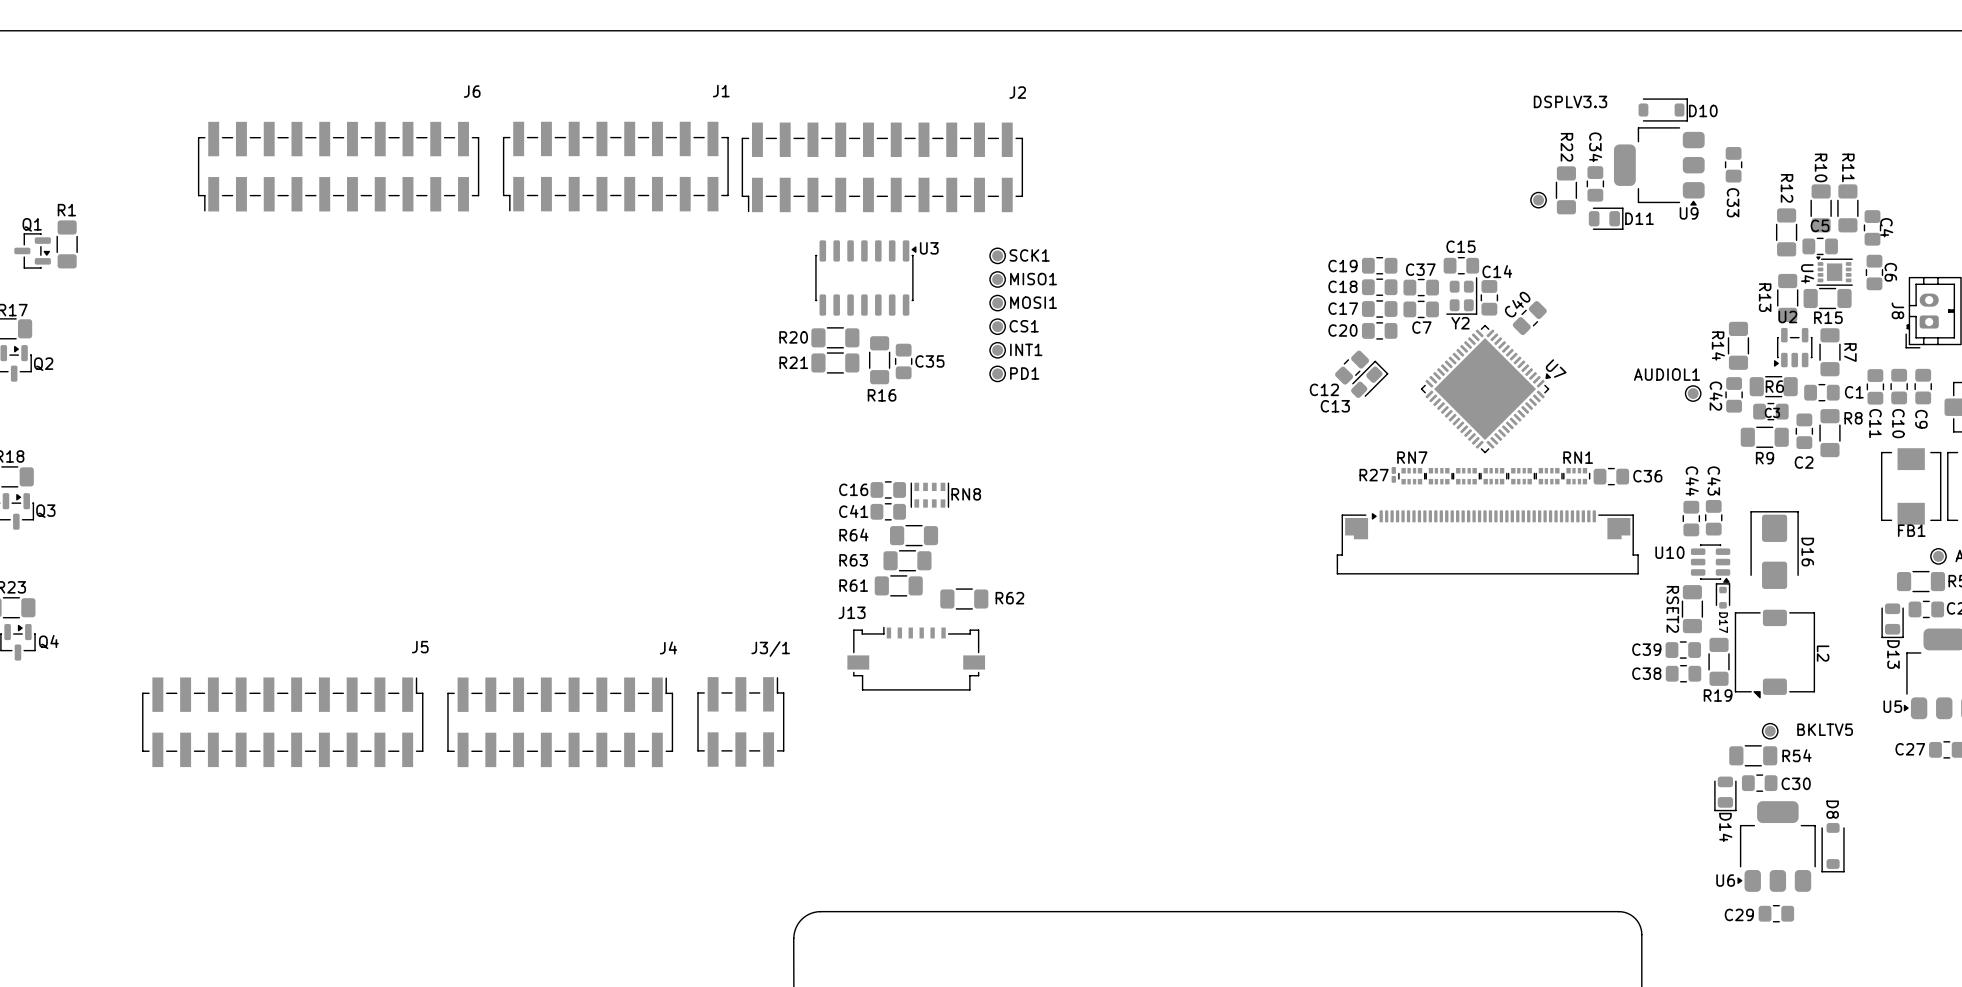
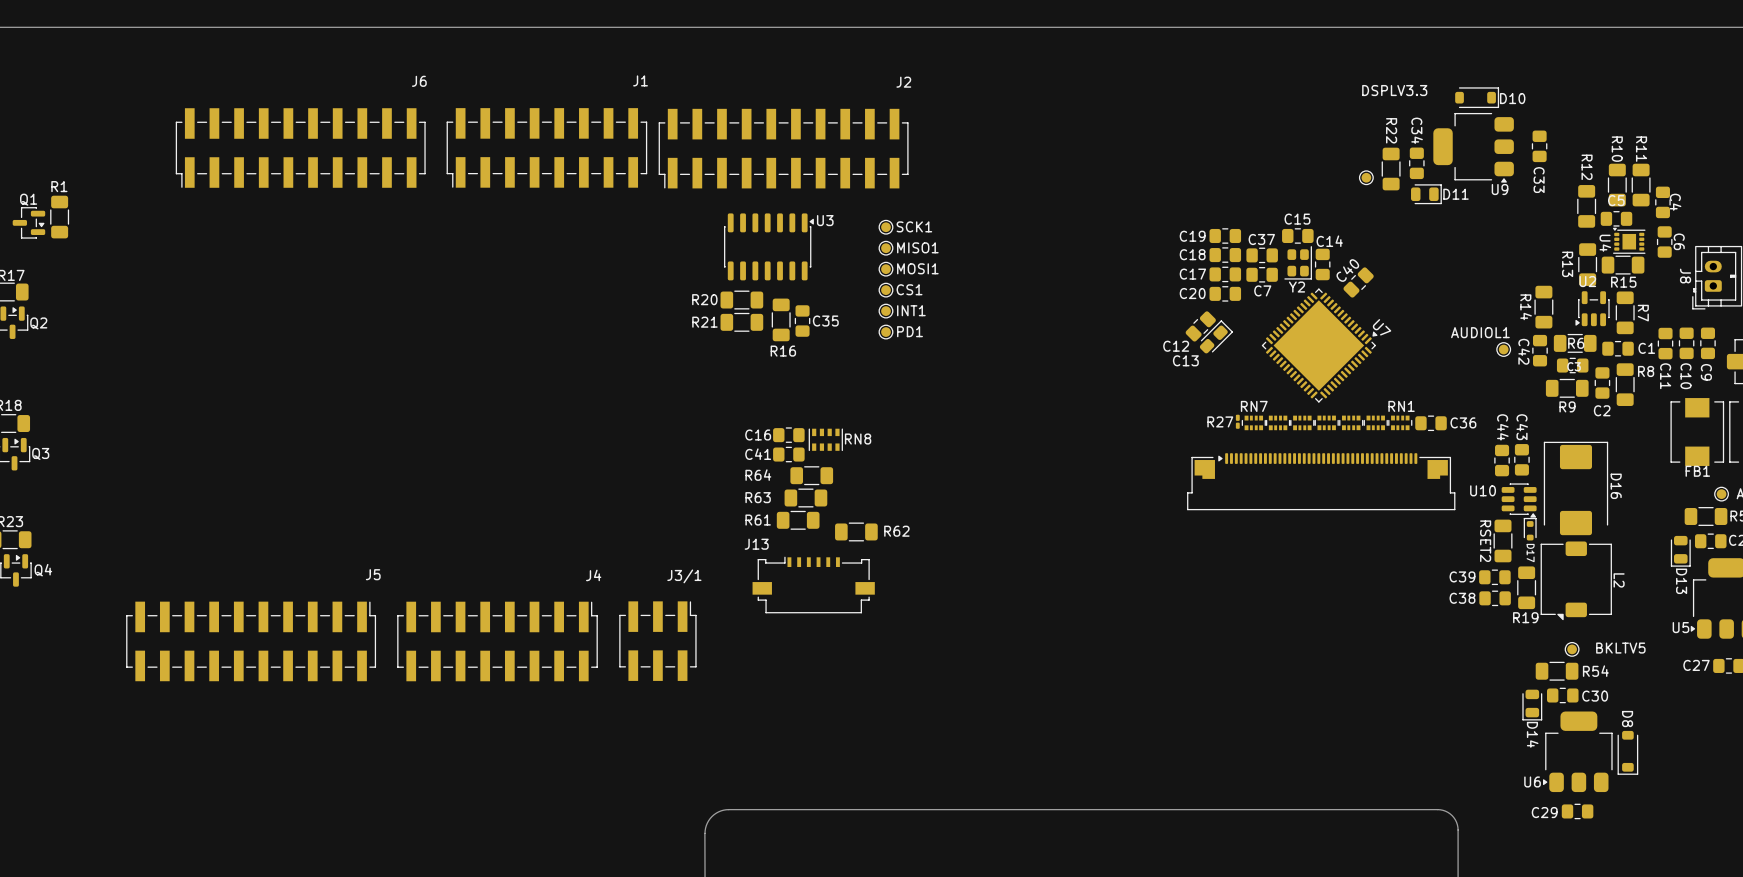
D16 footprint: [1750, 511, 1799, 589] -> [1543, 441, 1609, 536]

